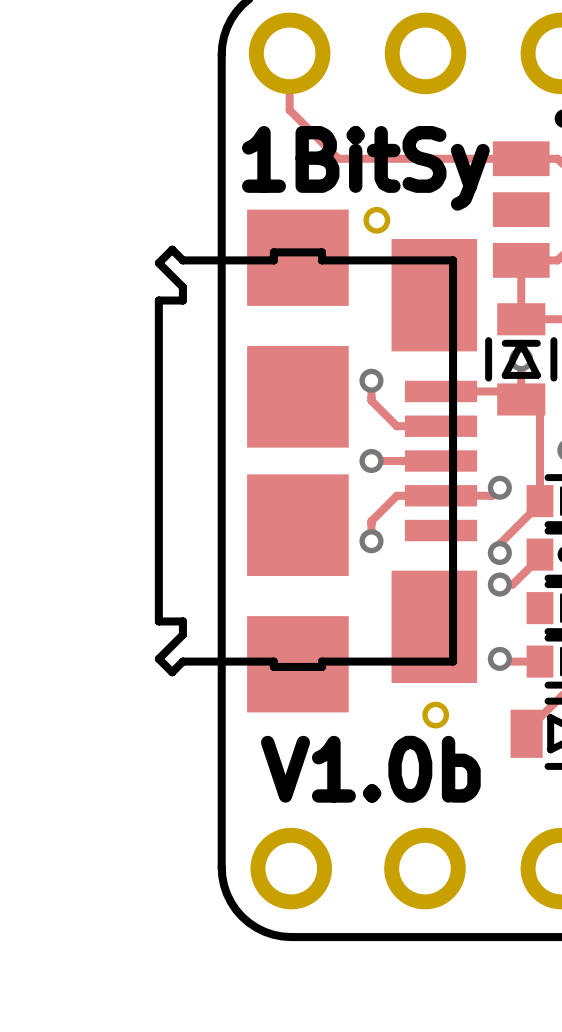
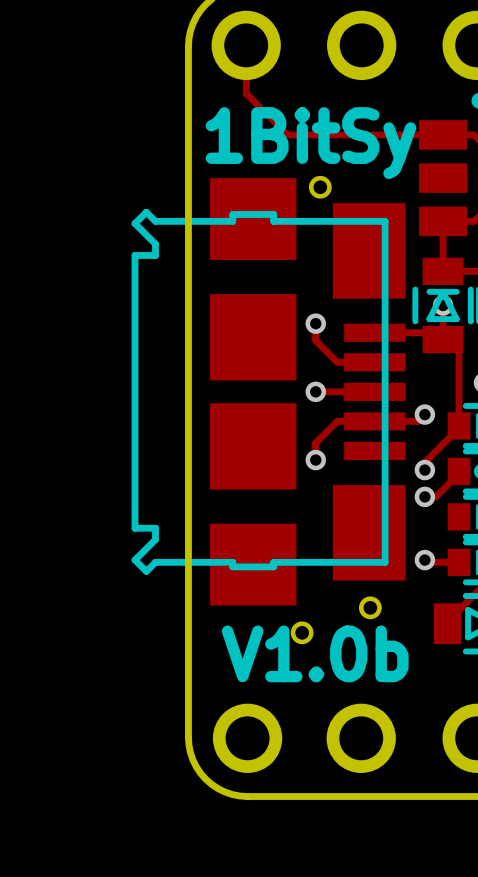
part: none -> (302, 632)

